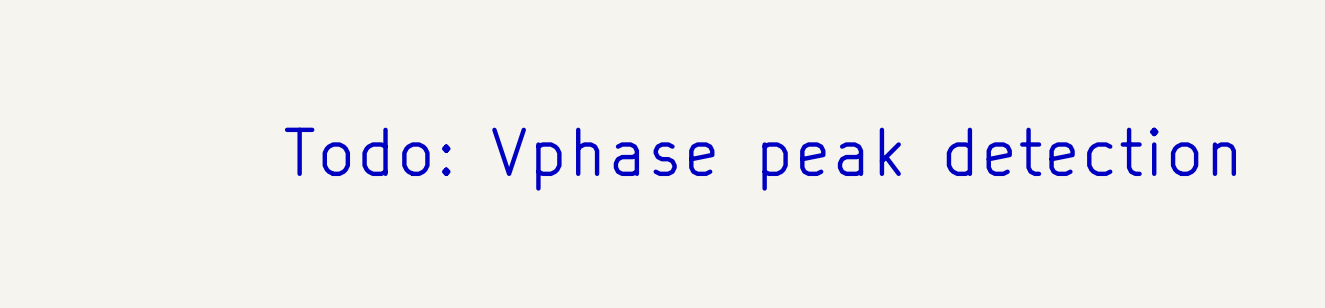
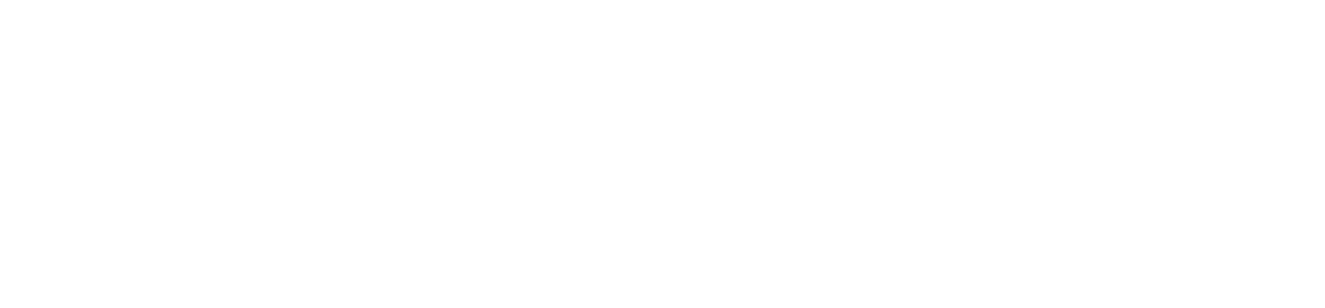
text: Todo: Vphase peak detection (760, 159) -> none

